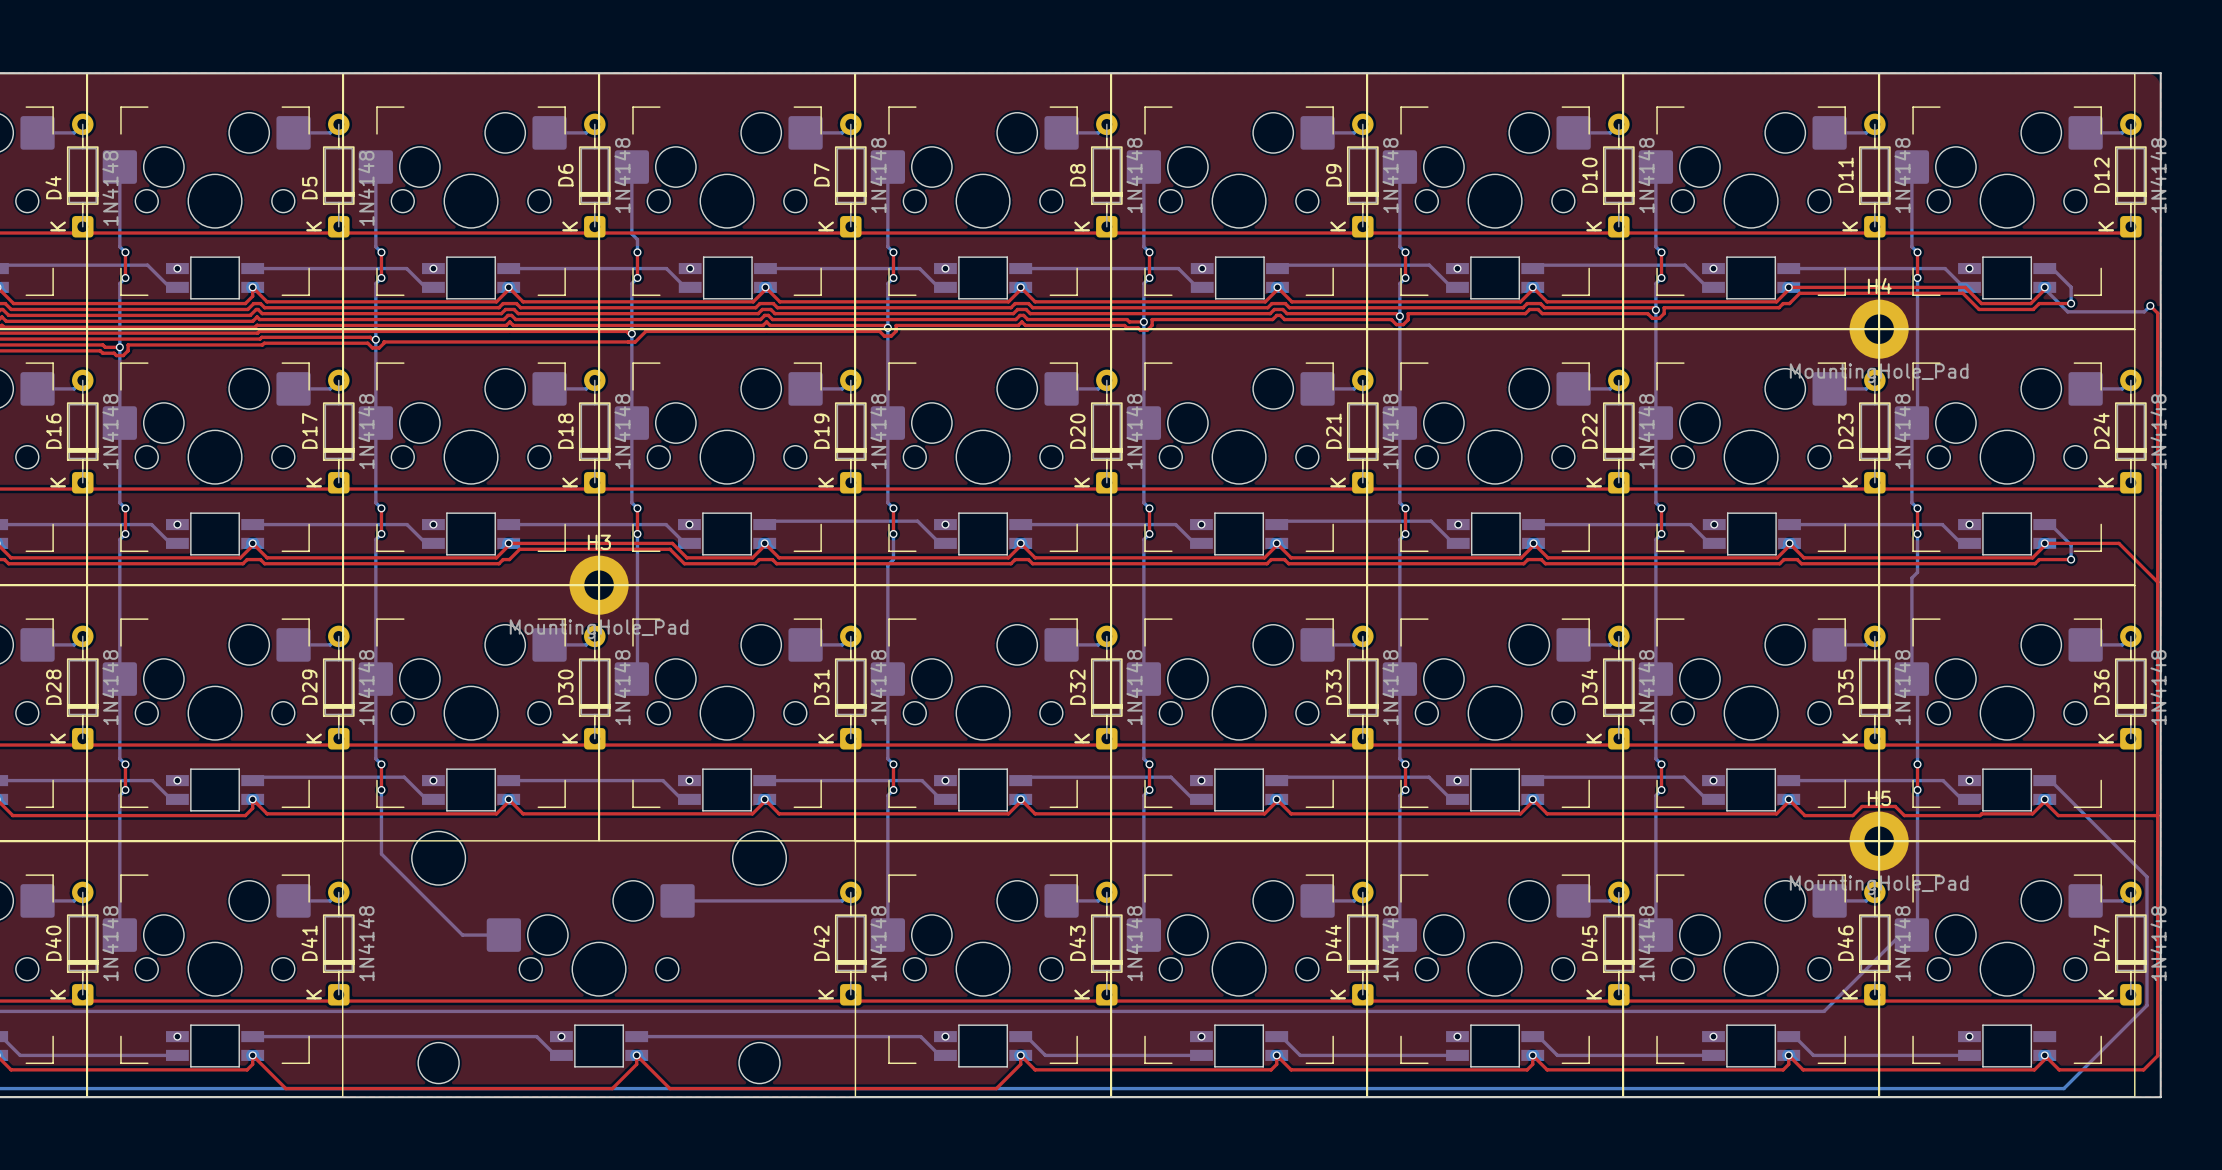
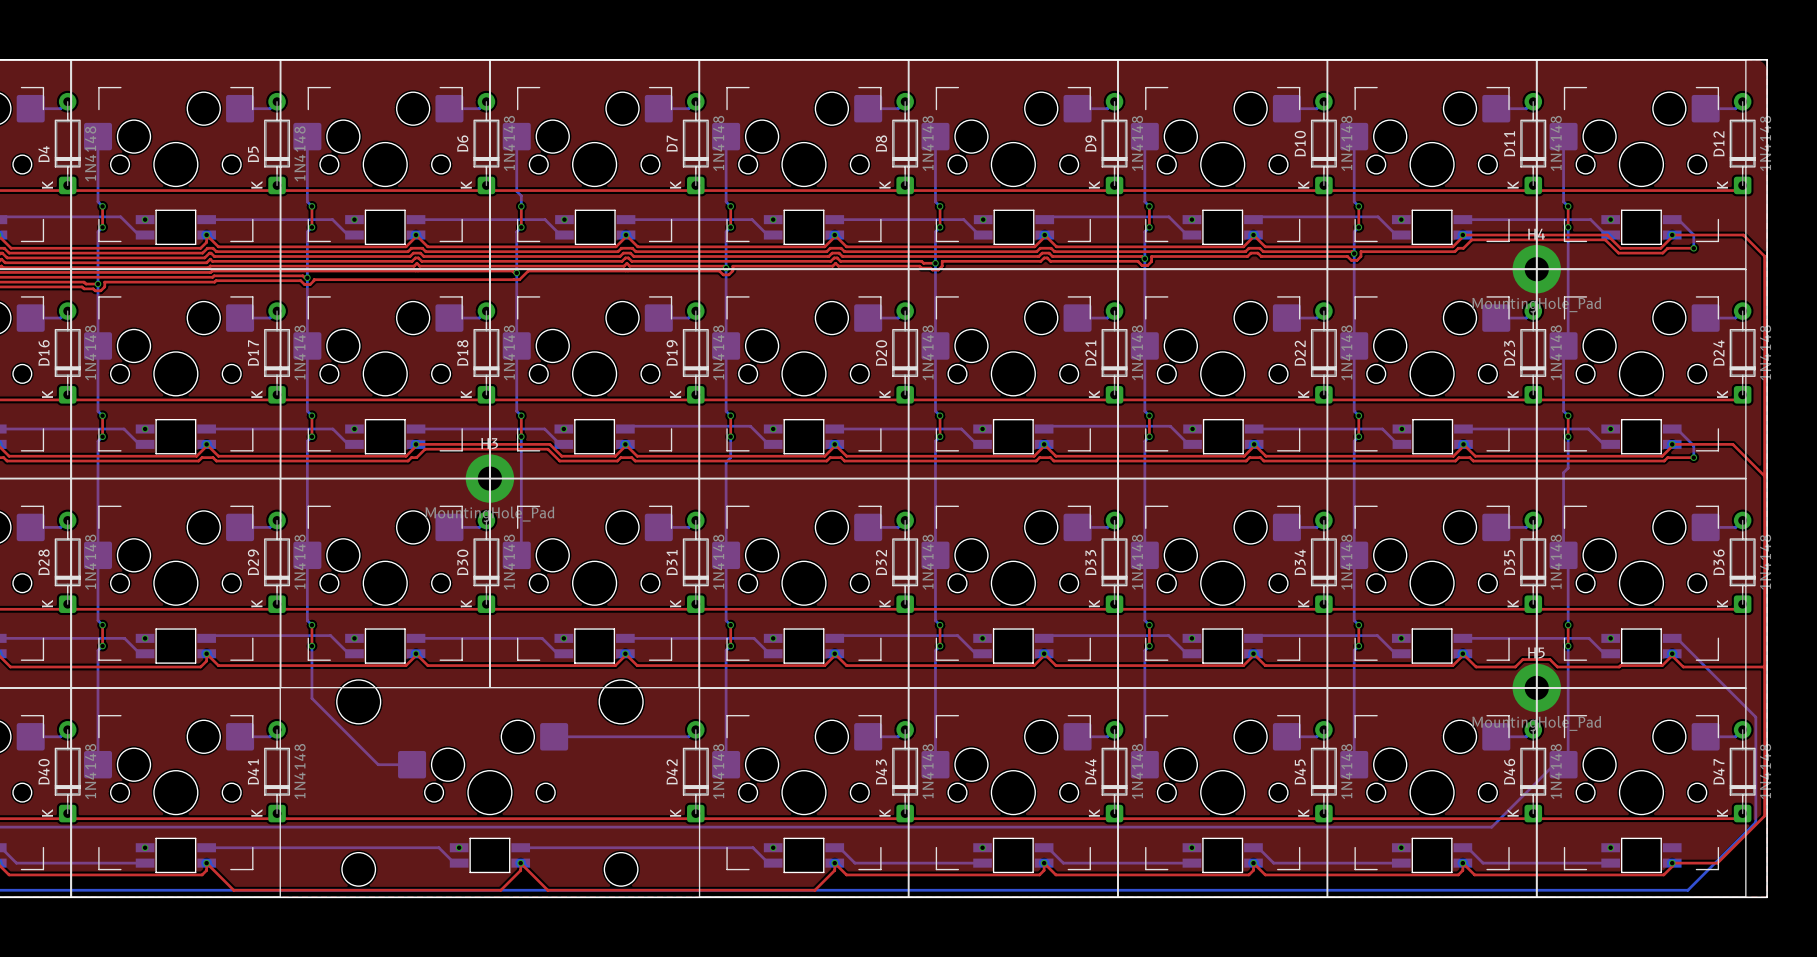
bottom track: (2044, 288) (2067, 311) (2144, 311) (2150, 305) -> none
top track: (2150, 305) (2157, 313) -> (1672, 235) (1743, 235) (1764, 256)
via: (2150, 305) -> none
top track: (2157, 997) (2157, 1055) (2143, 1069) (2059, 1069) (2045, 1056) -> (1764, 816) (1717, 863) (1672, 863)

